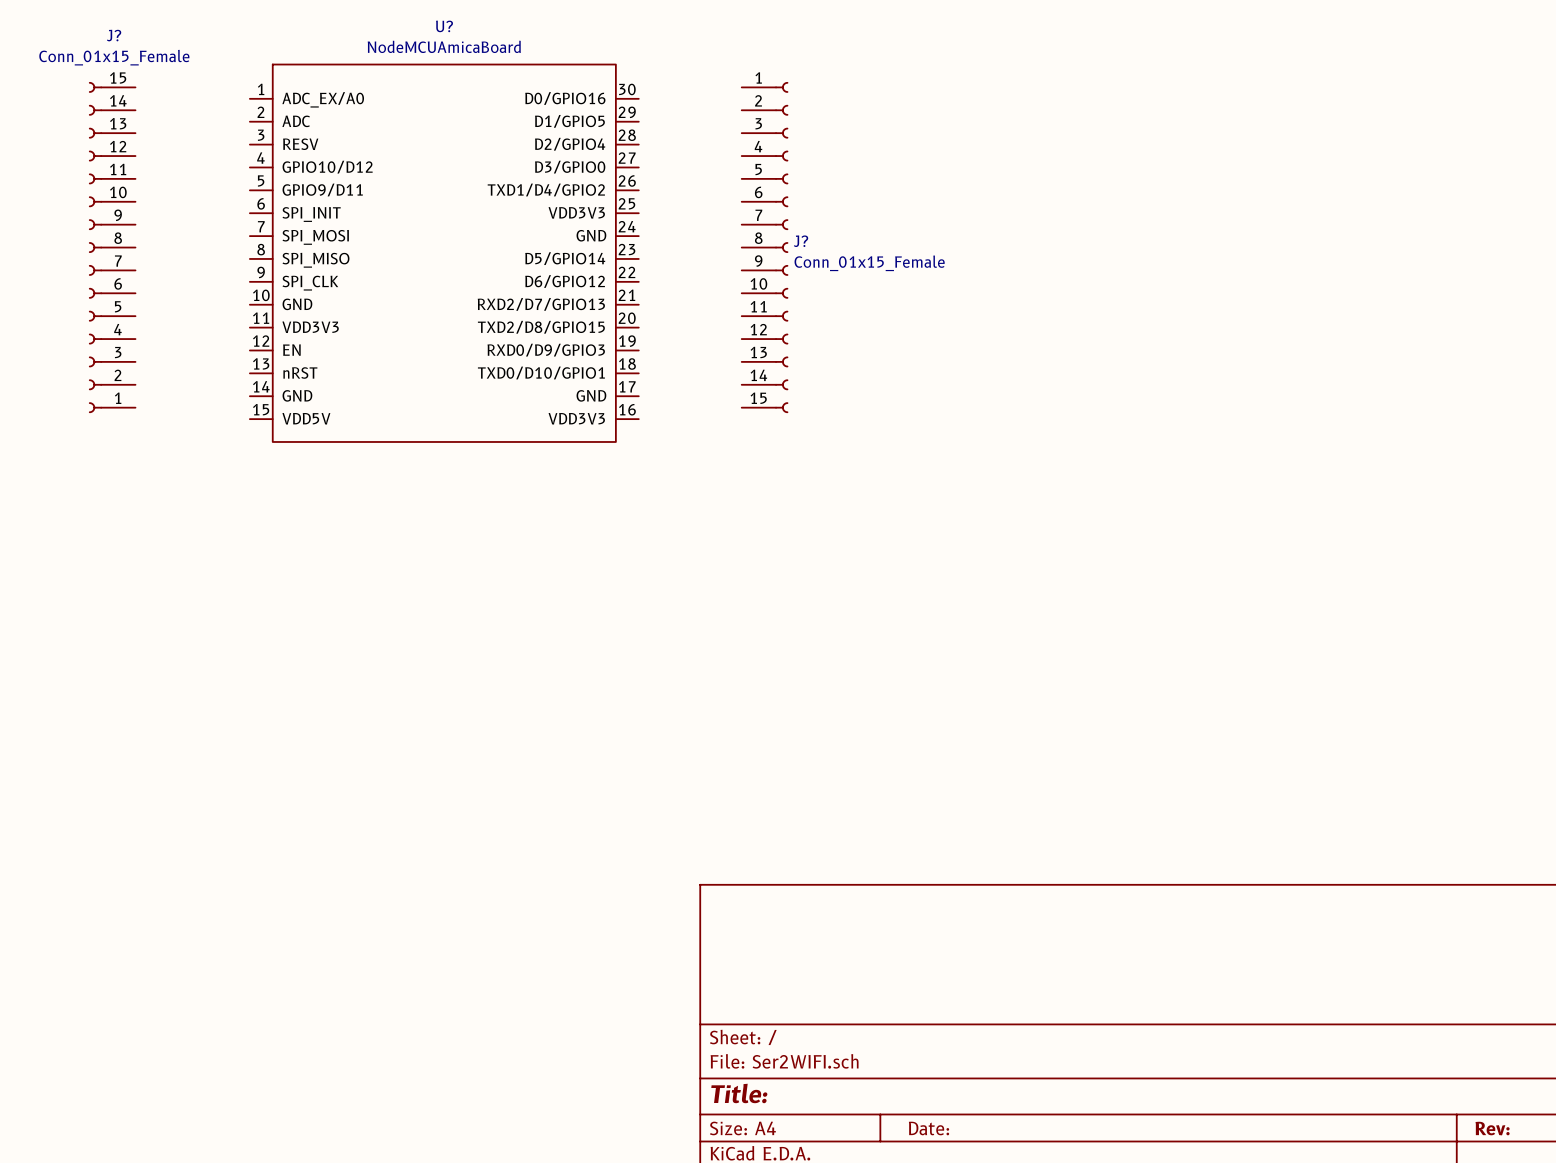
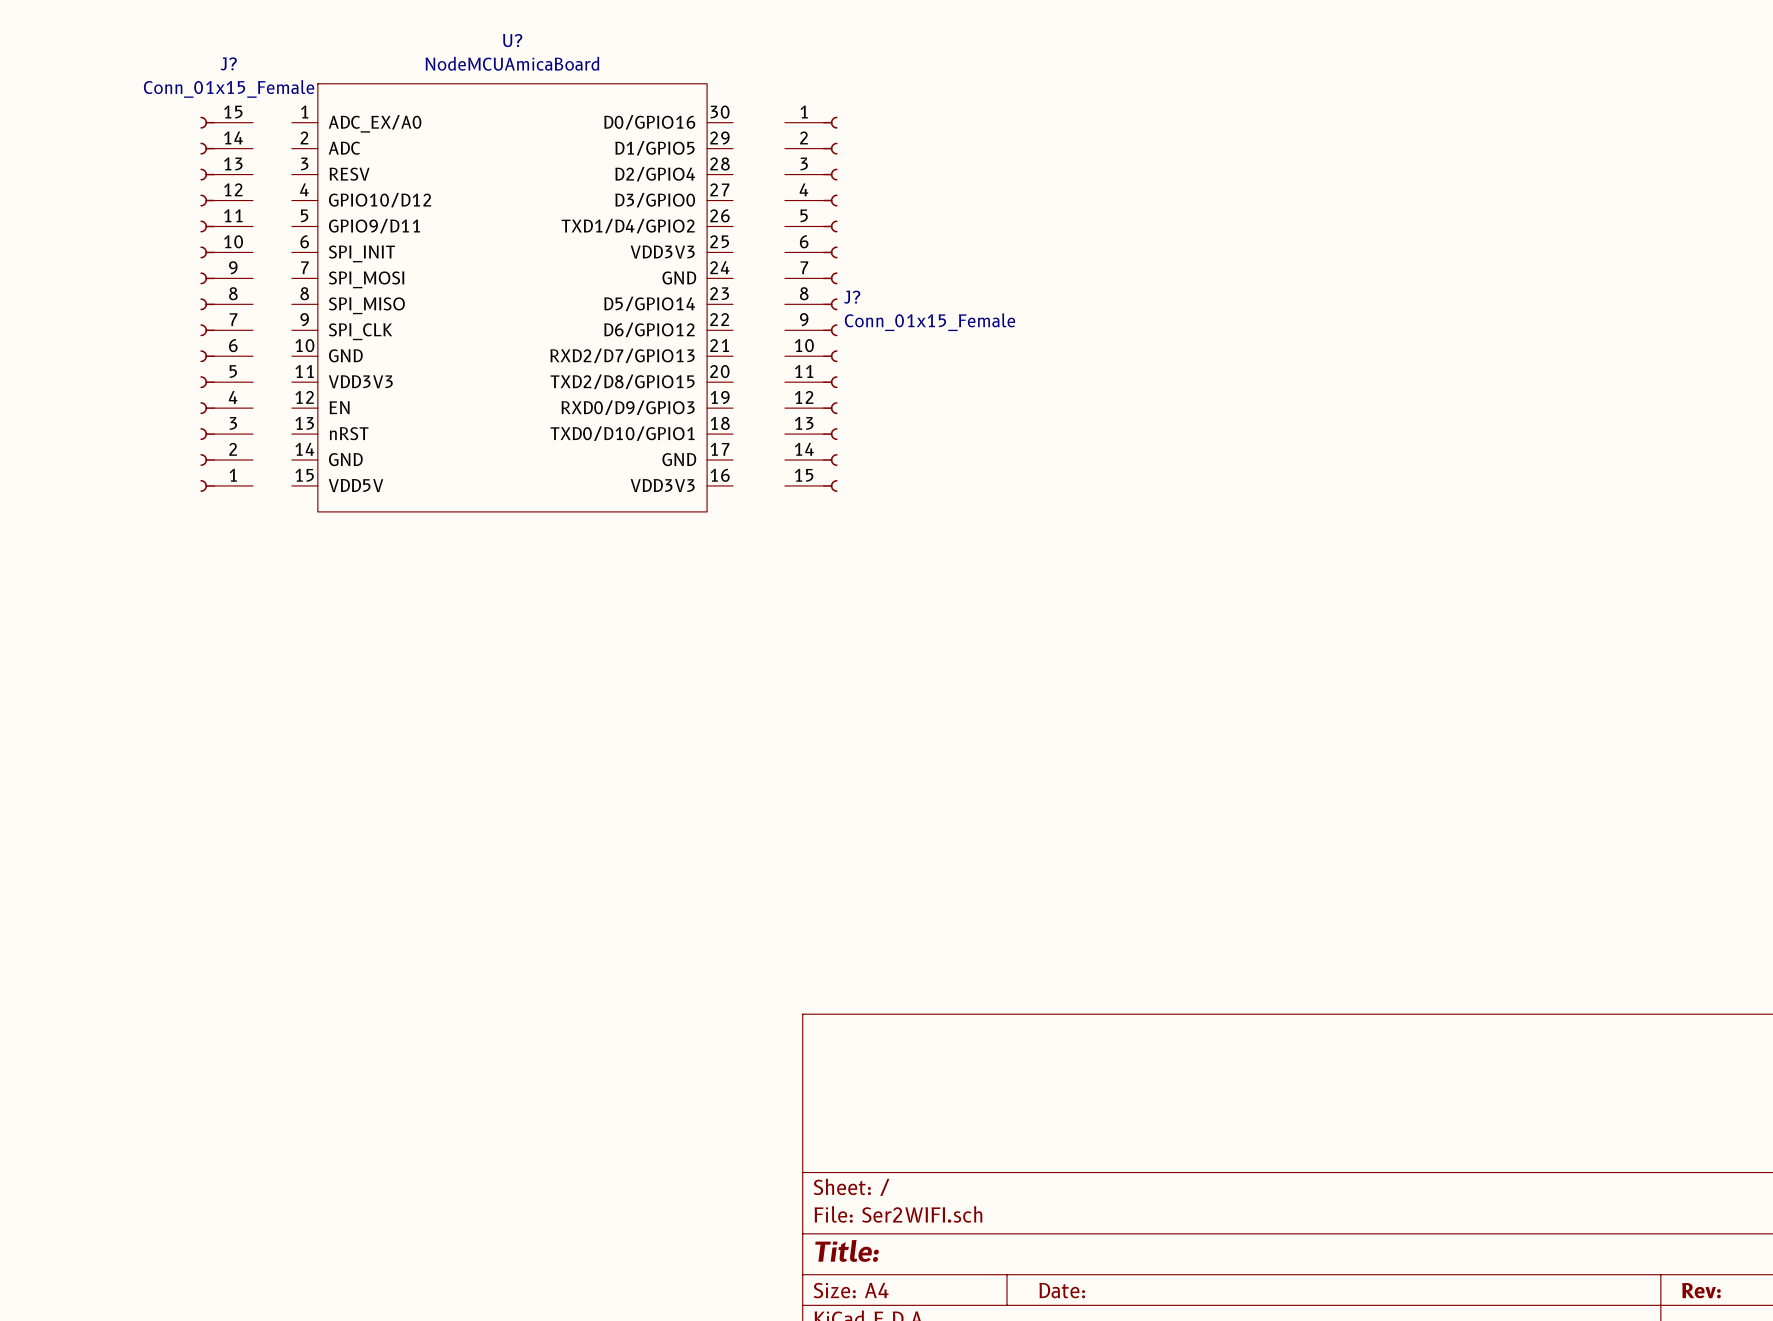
J? position: (112, 247) -> (226, 304)
J? position: (764, 247) -> (811, 304)

